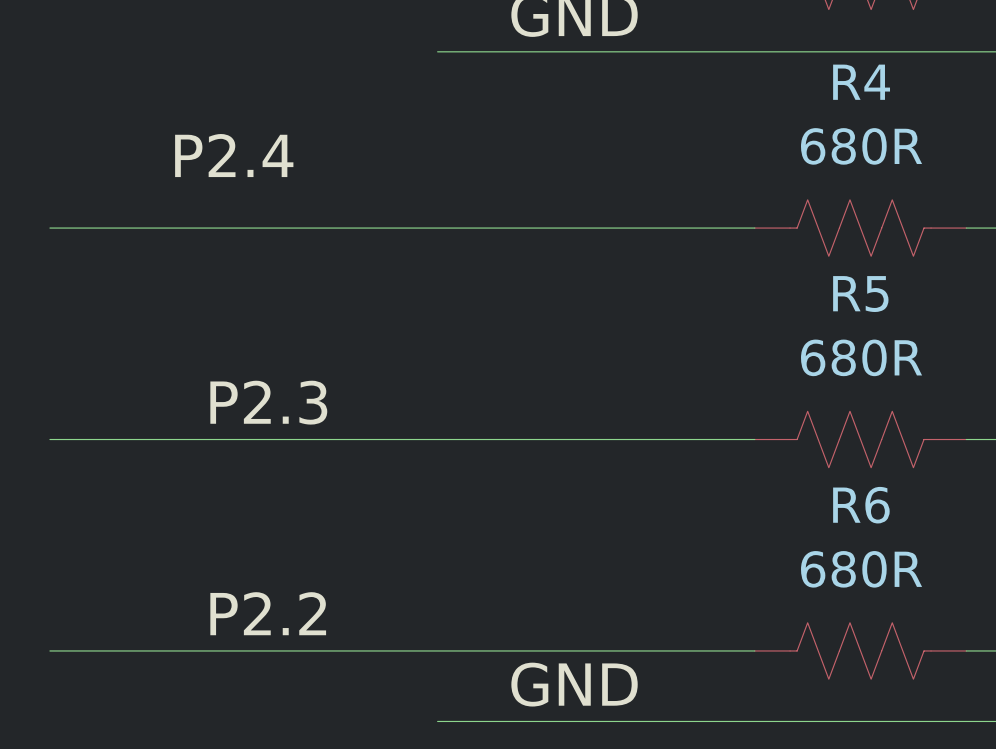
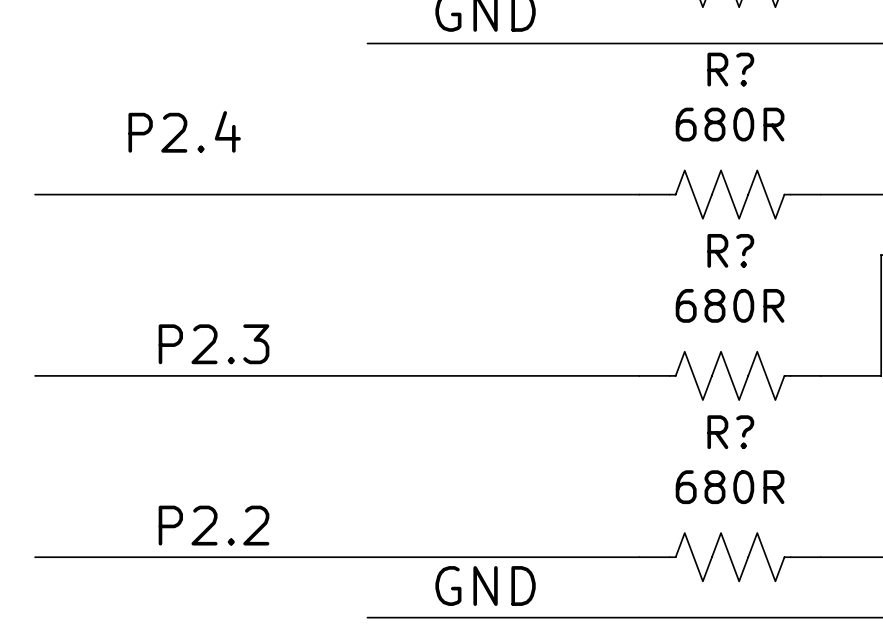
R4 name: R4 (861, 82) -> R? (730, 69)
R5 name: R5 (860, 294) -> R? (730, 250)
R6 name: R6 (861, 505) -> R? (730, 432)

